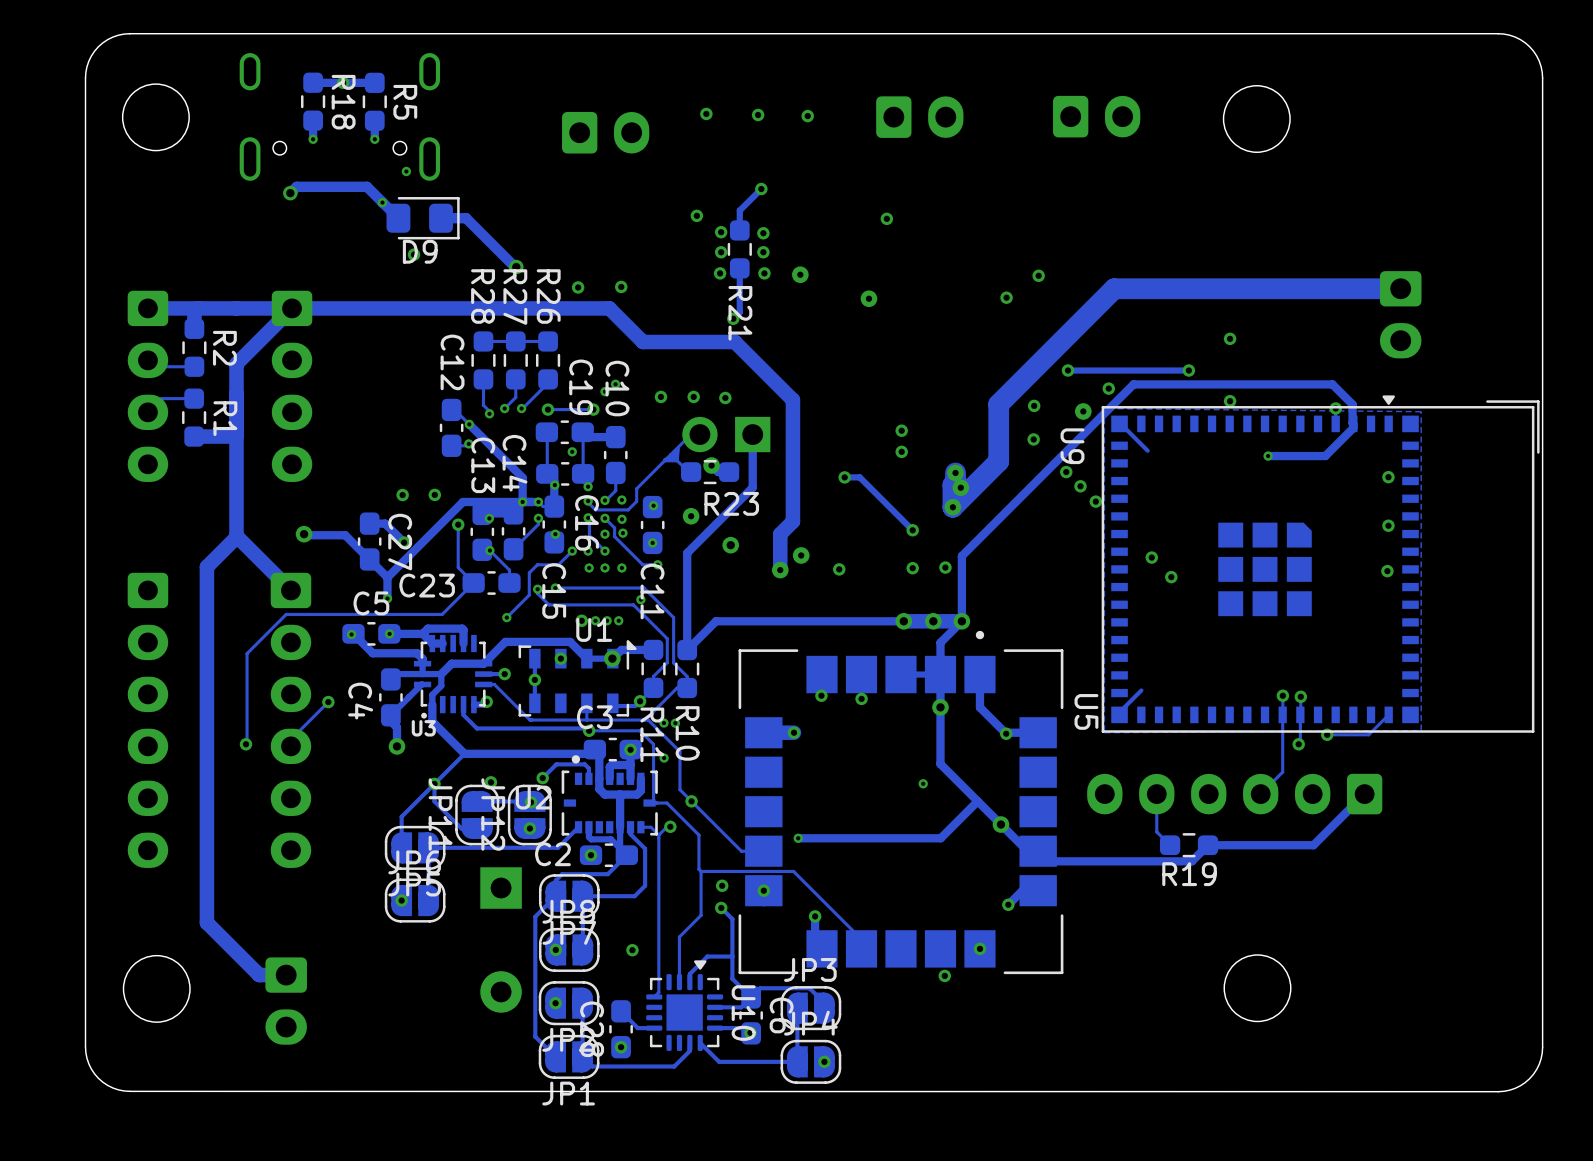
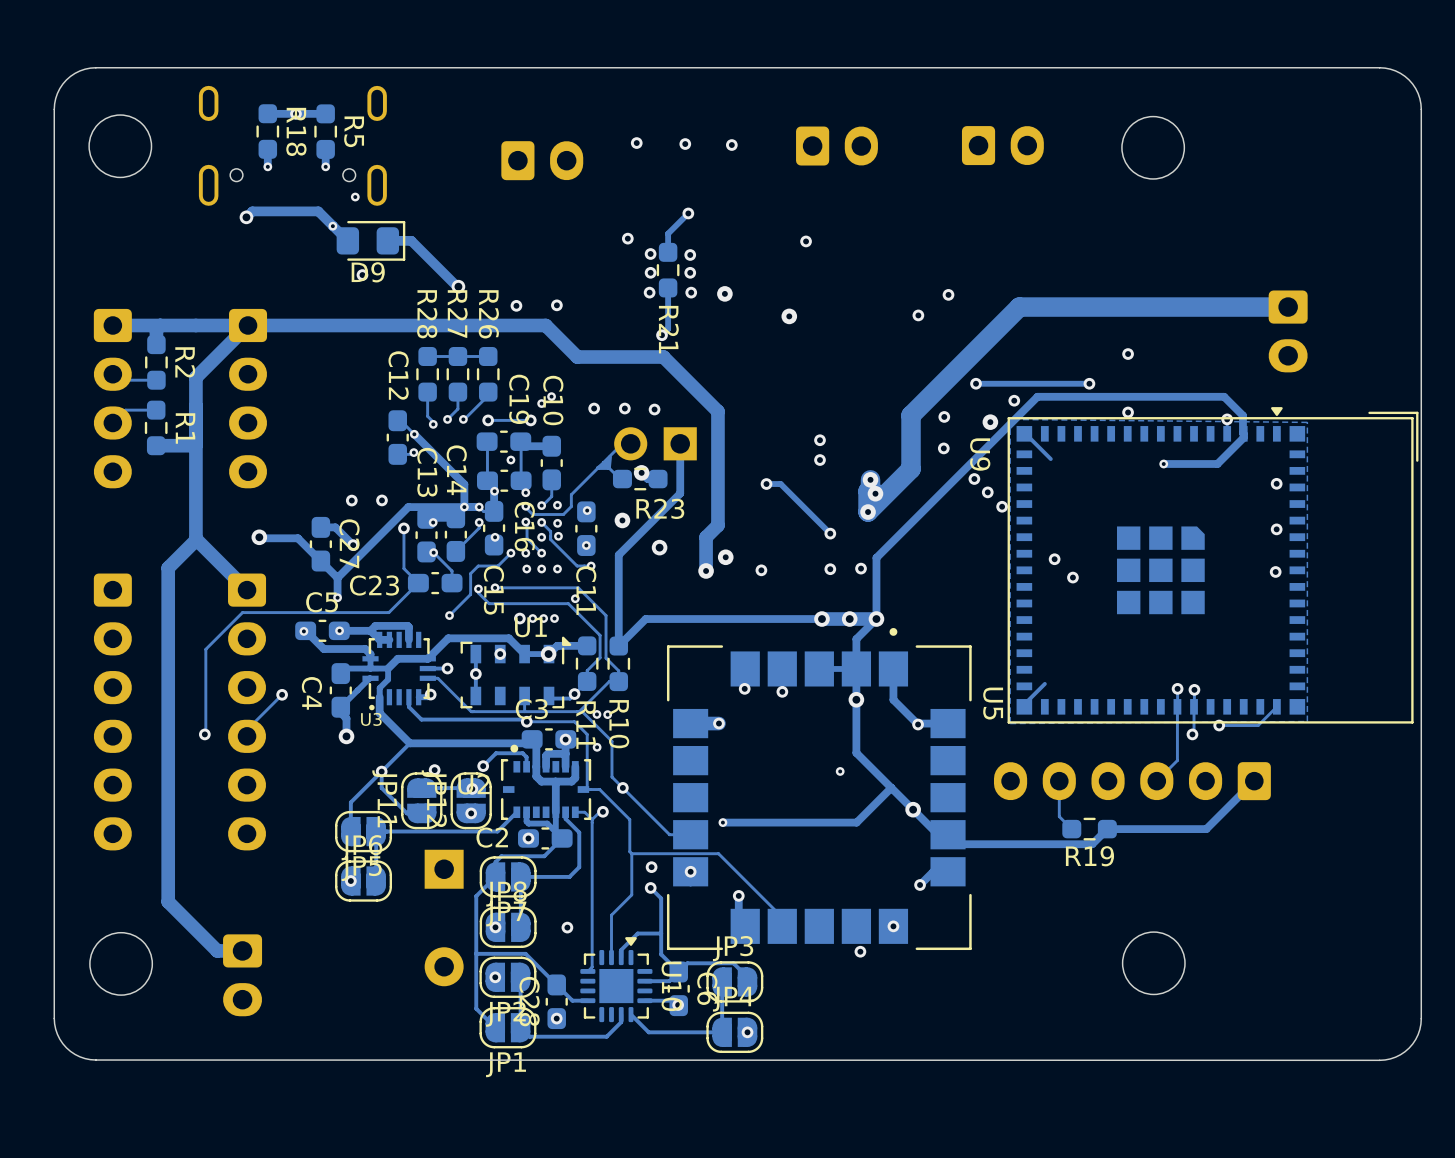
track: none -> (476, 953) (525, 953) (556, 984)

